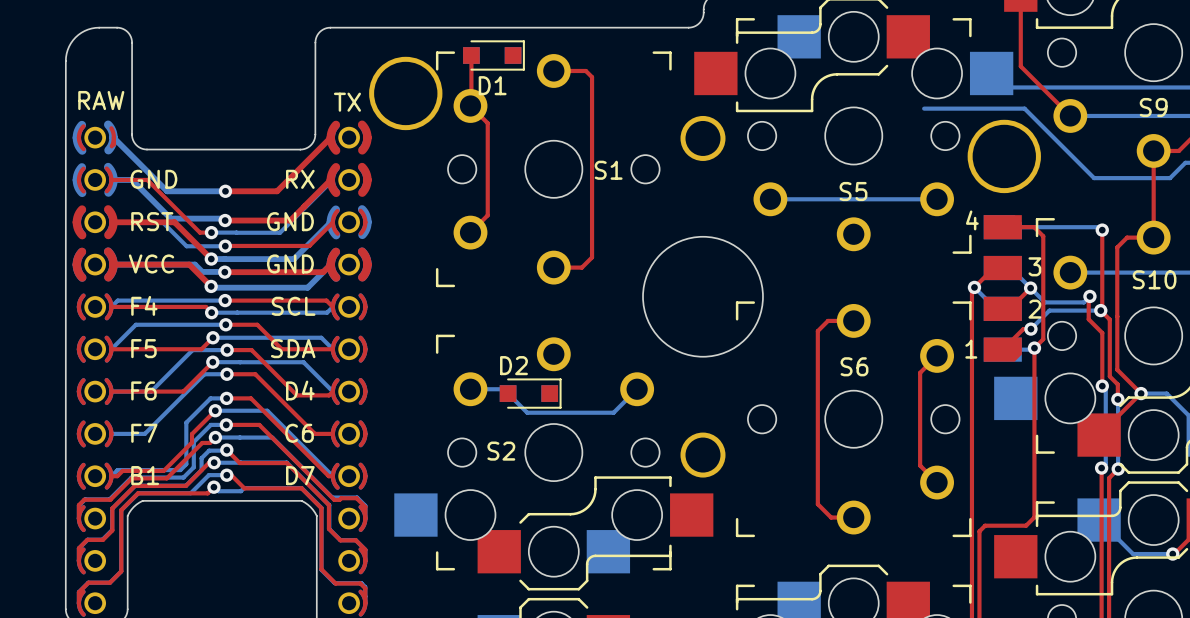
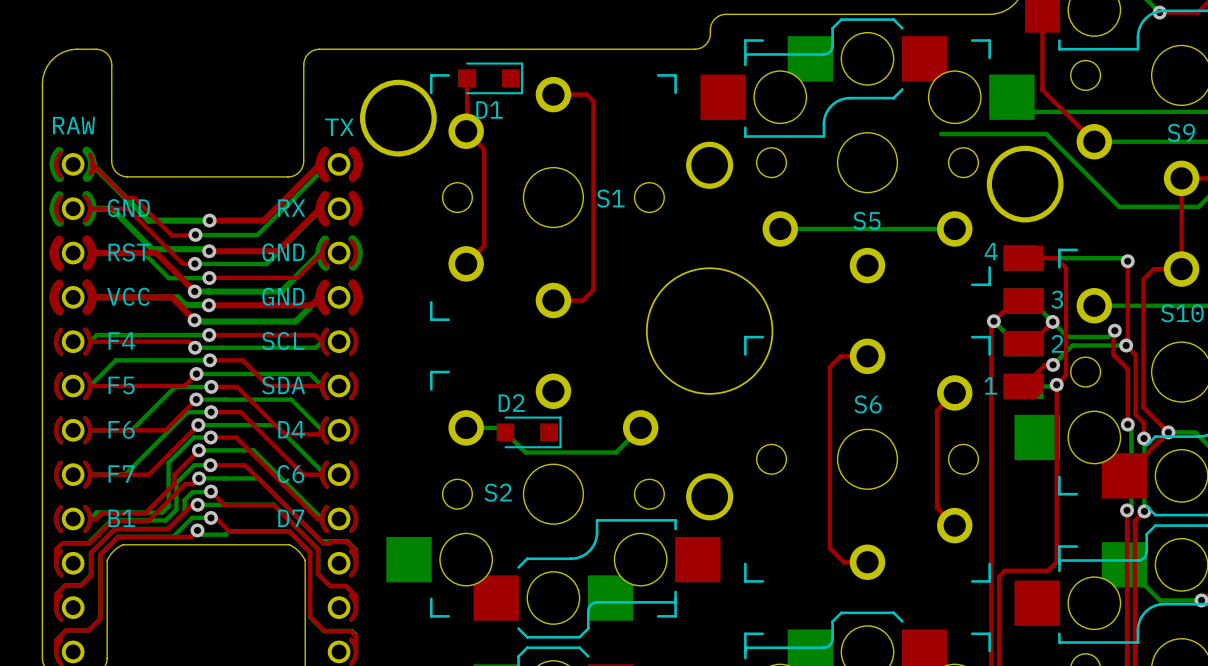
top track: none -> (92, 164) (126, 197) (134, 197) (171, 235) (195, 234)
bottom track: none -> (322, 164) (322, 170) (257, 235) (195, 235)
via: none -> (195, 234)
top track: none -> (198, 425) (148, 474) (90, 474)
bottom track: none -> (198, 425) (275, 425) (322, 471) (322, 474)
via: none -> (198, 425)

